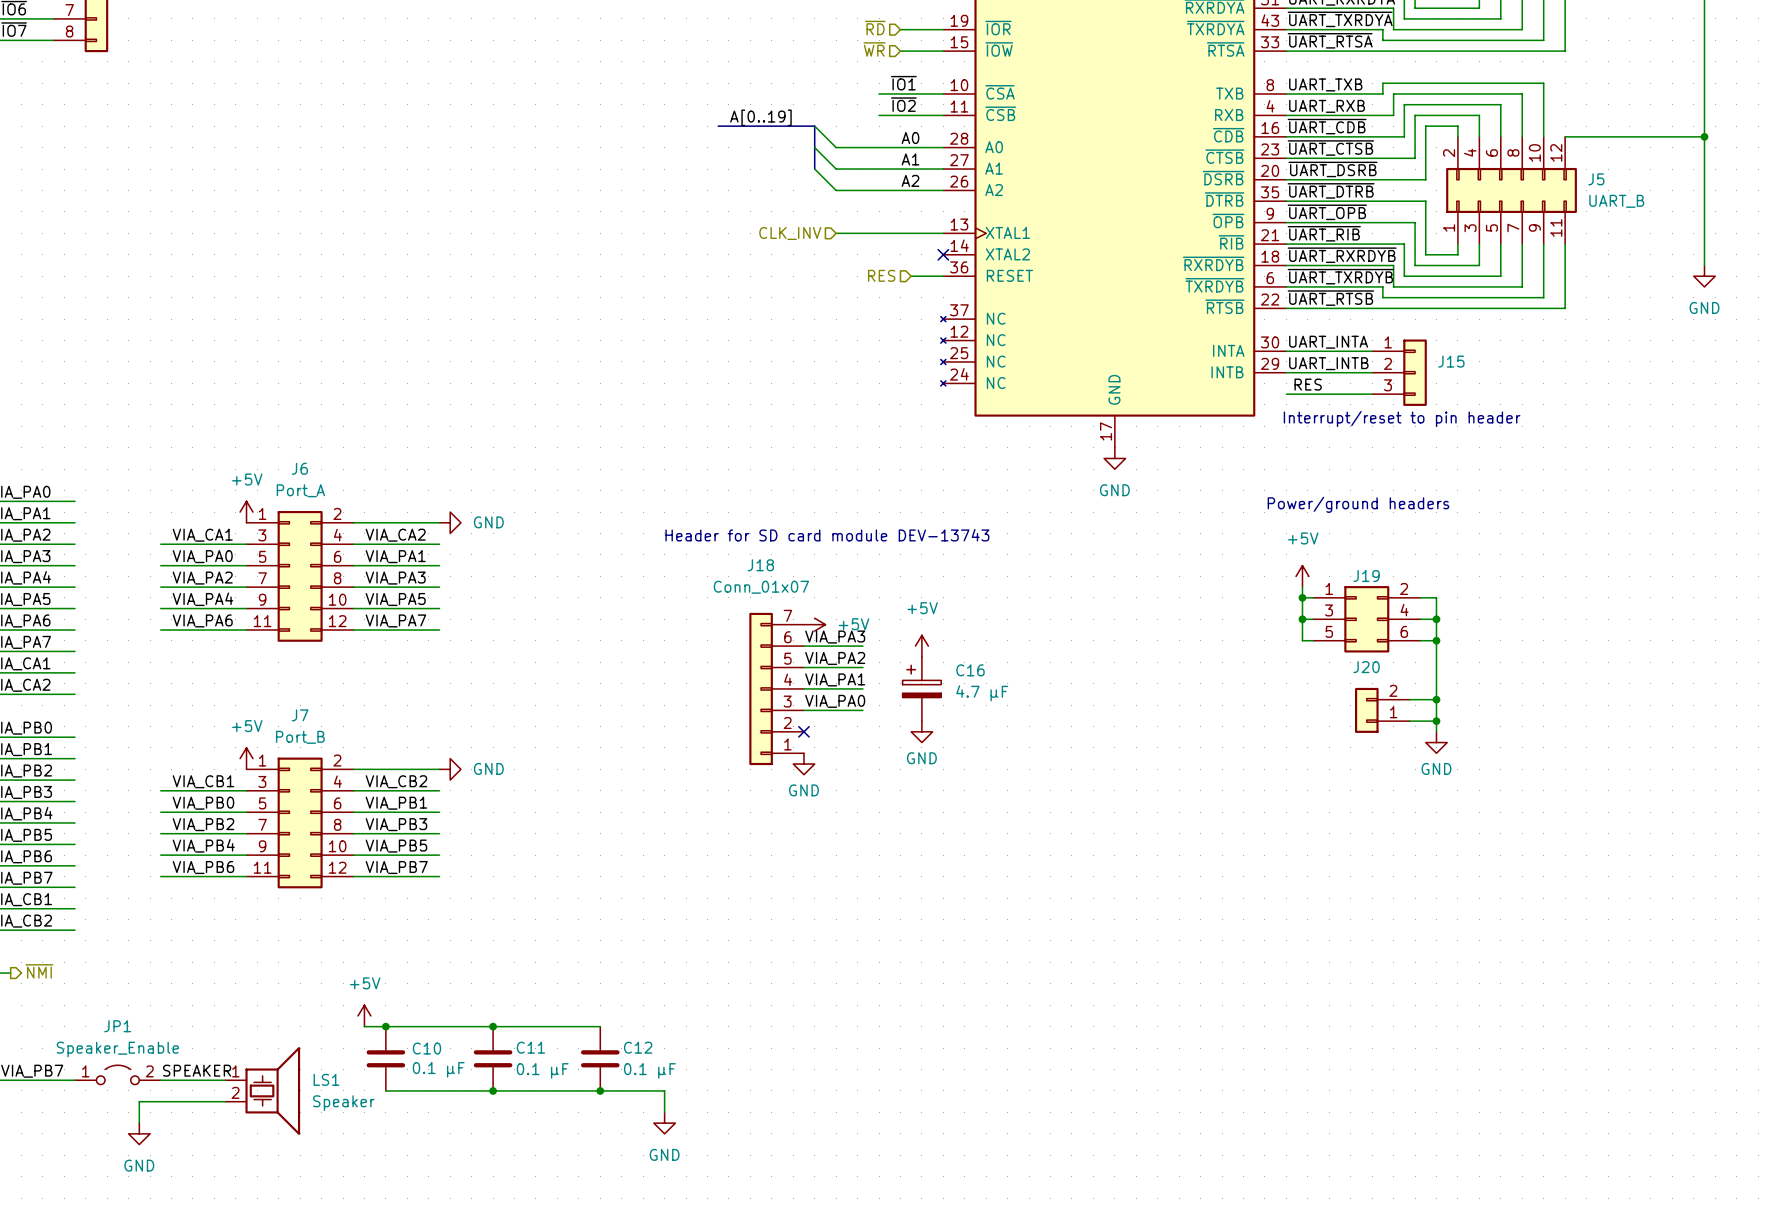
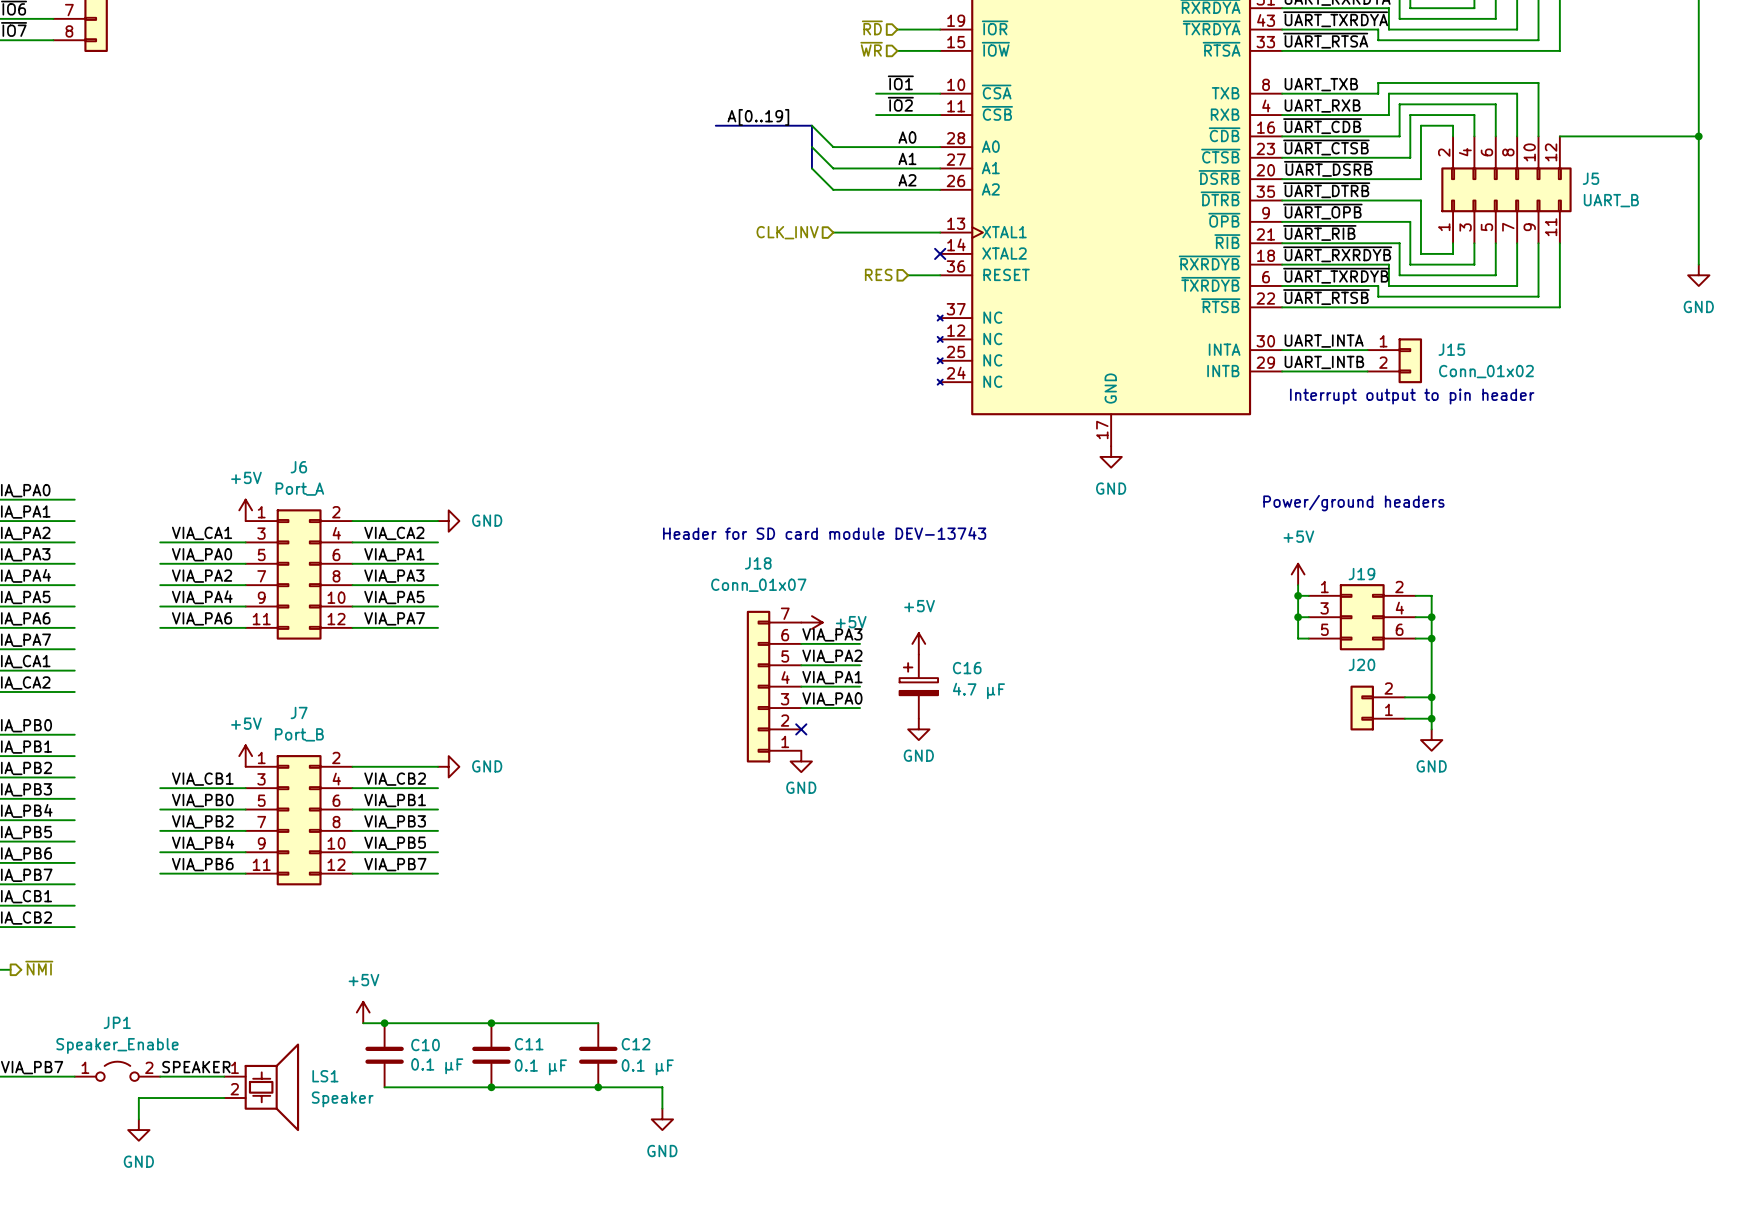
J15 symbol: [1372, 339, 1427, 406] -> [1367, 338, 1423, 384]
J15 value: none -> Conn_01x02 (1486, 371)
label: RES (1308, 384) -> none
wire: (1286, 394) (1372, 394) -> none
text: Interrupt/reset to pin header (1402, 419) -> Interrupt output to pin header (1412, 396)

